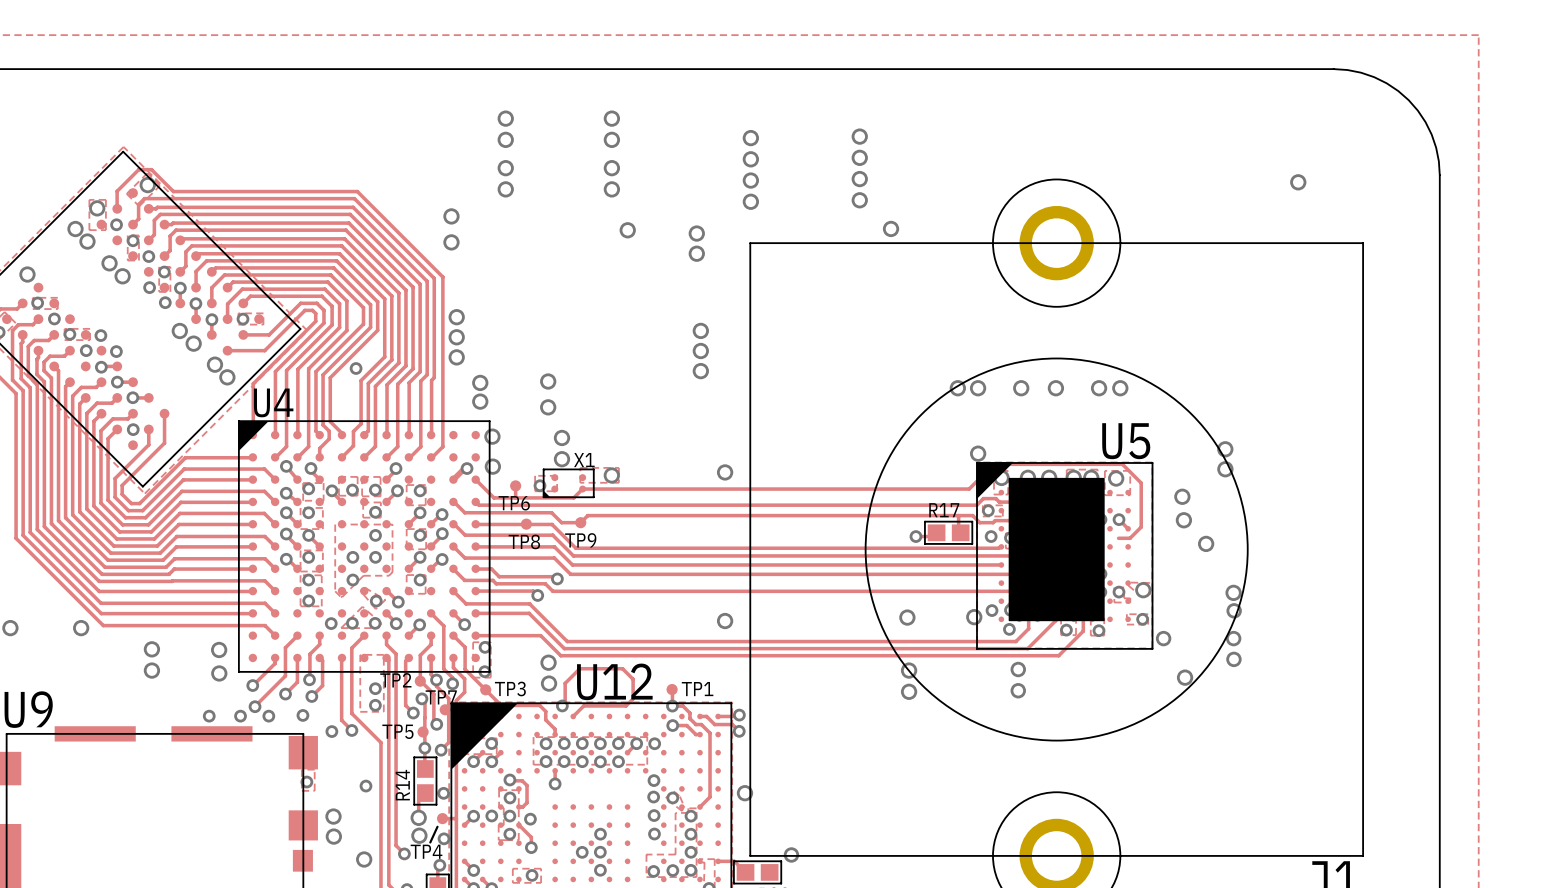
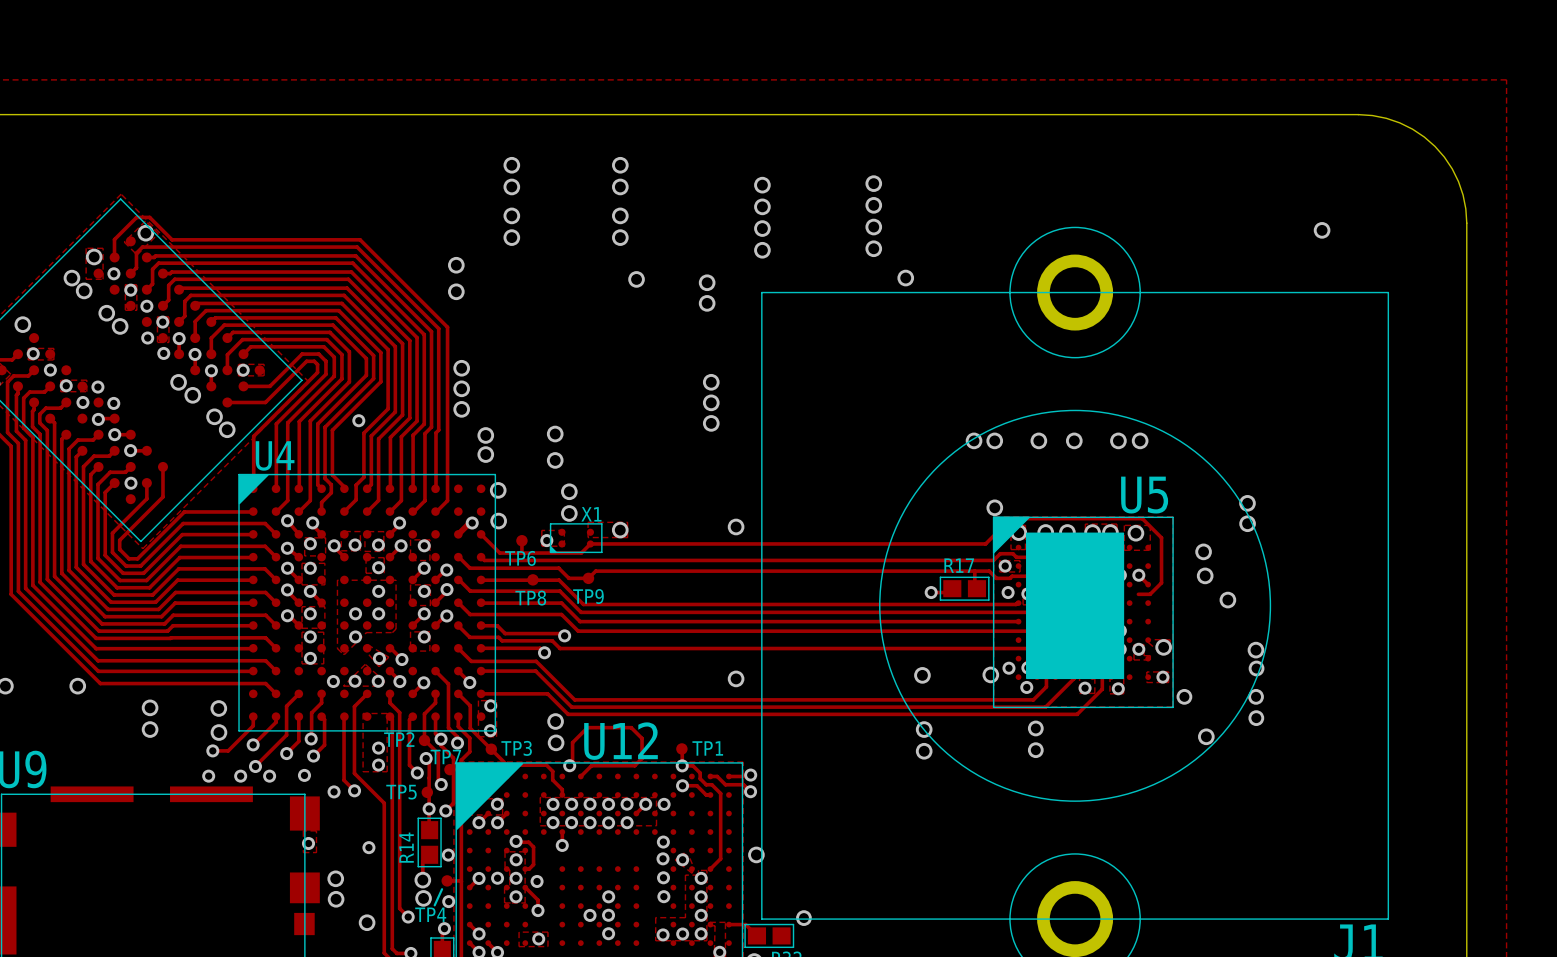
track: none -> (253, 716) (253, 725) (228, 750) (212, 750)
via: none -> (212, 750)

